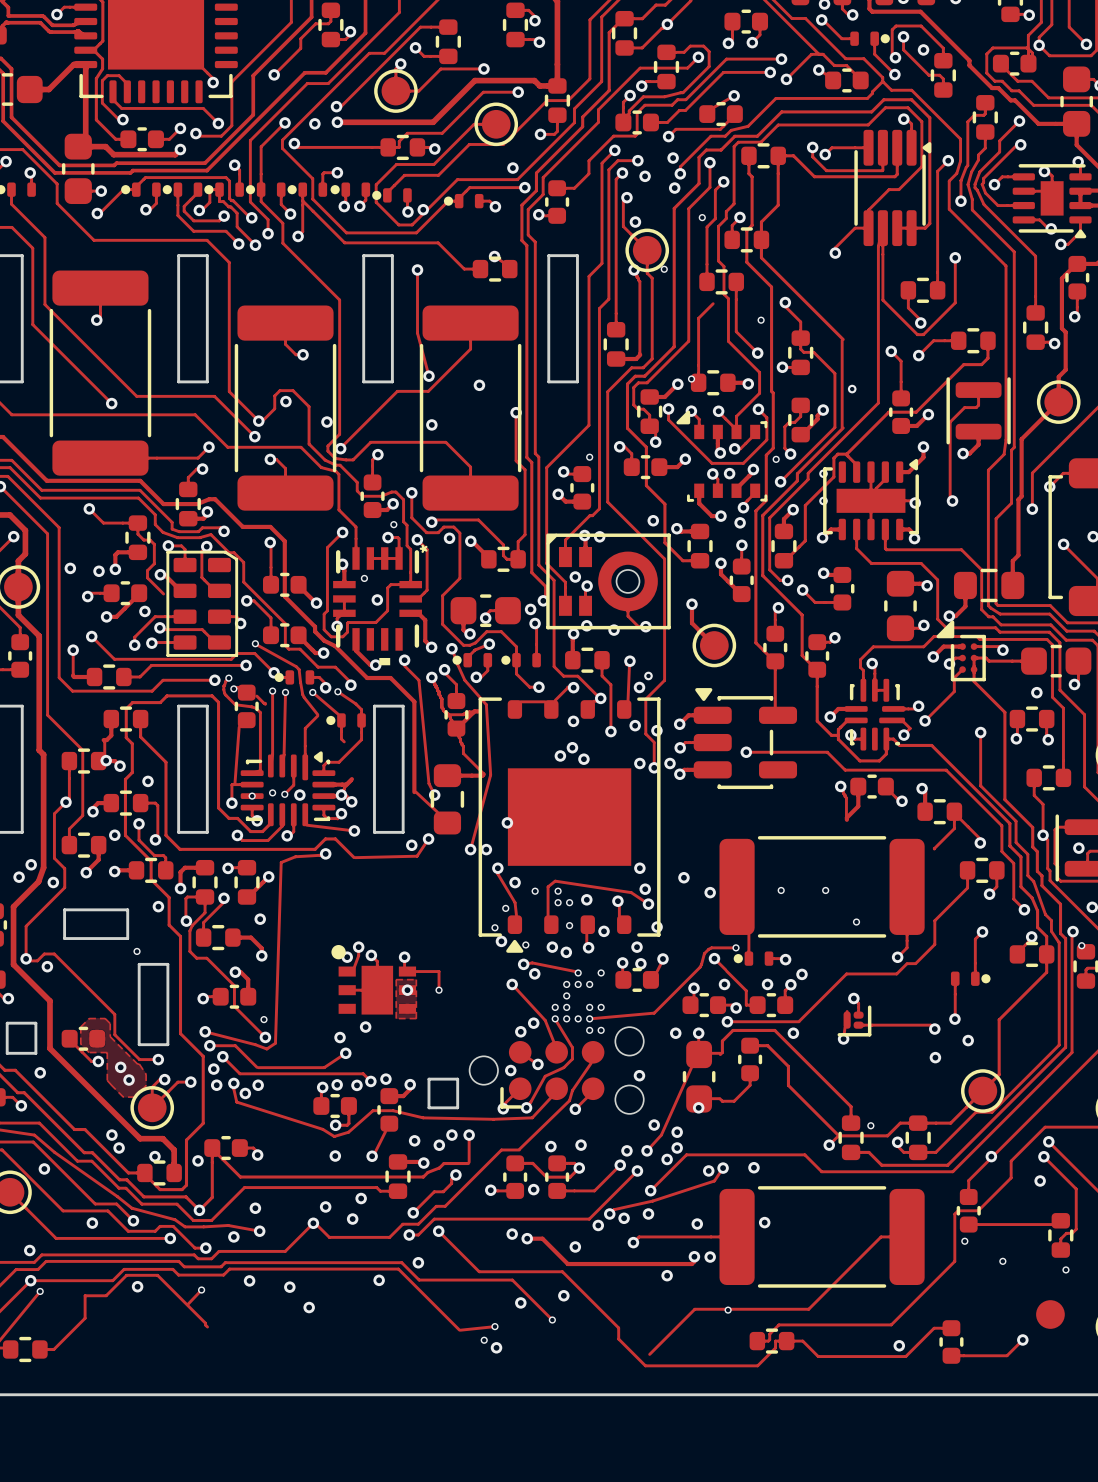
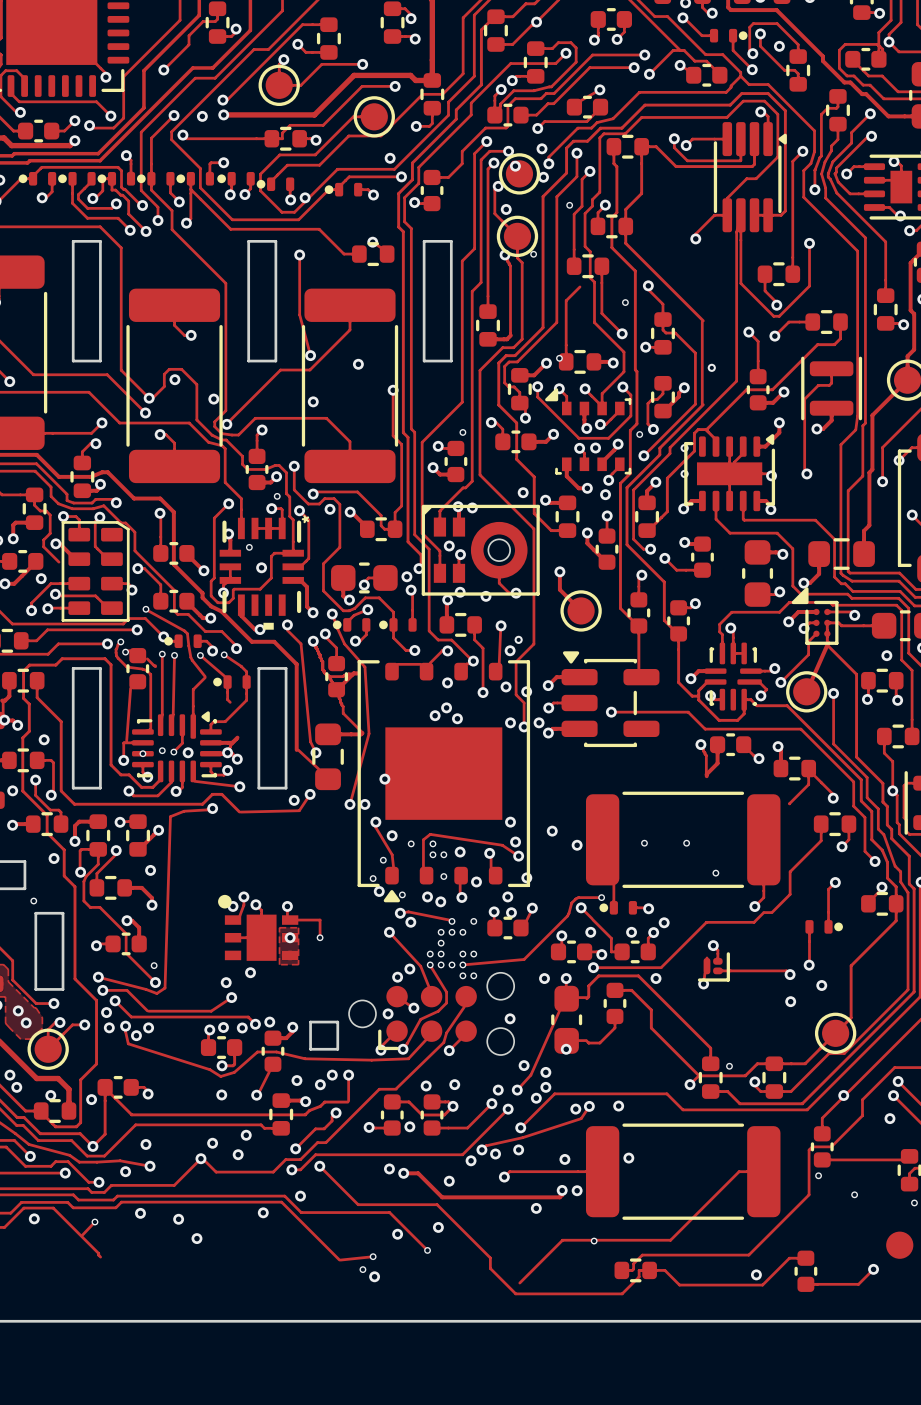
part: none -> (519, 173)
track: none -> (828, 642) (806, 691)
part: none -> (806, 691)

